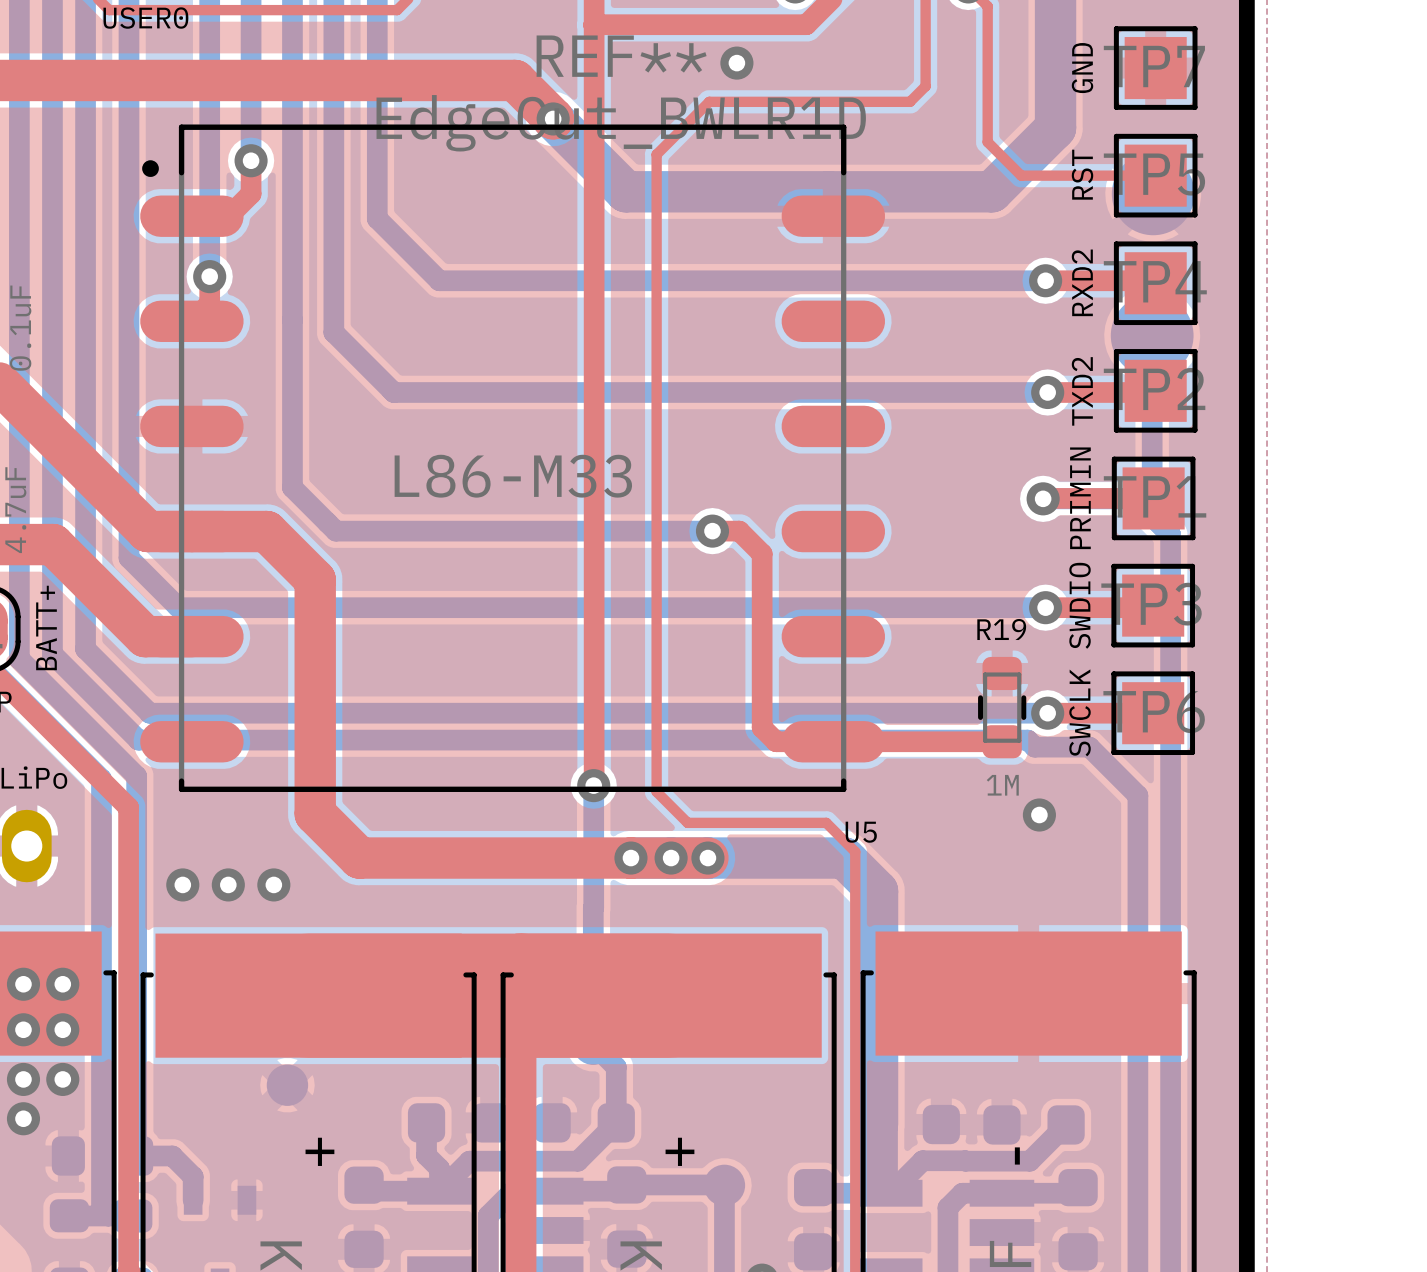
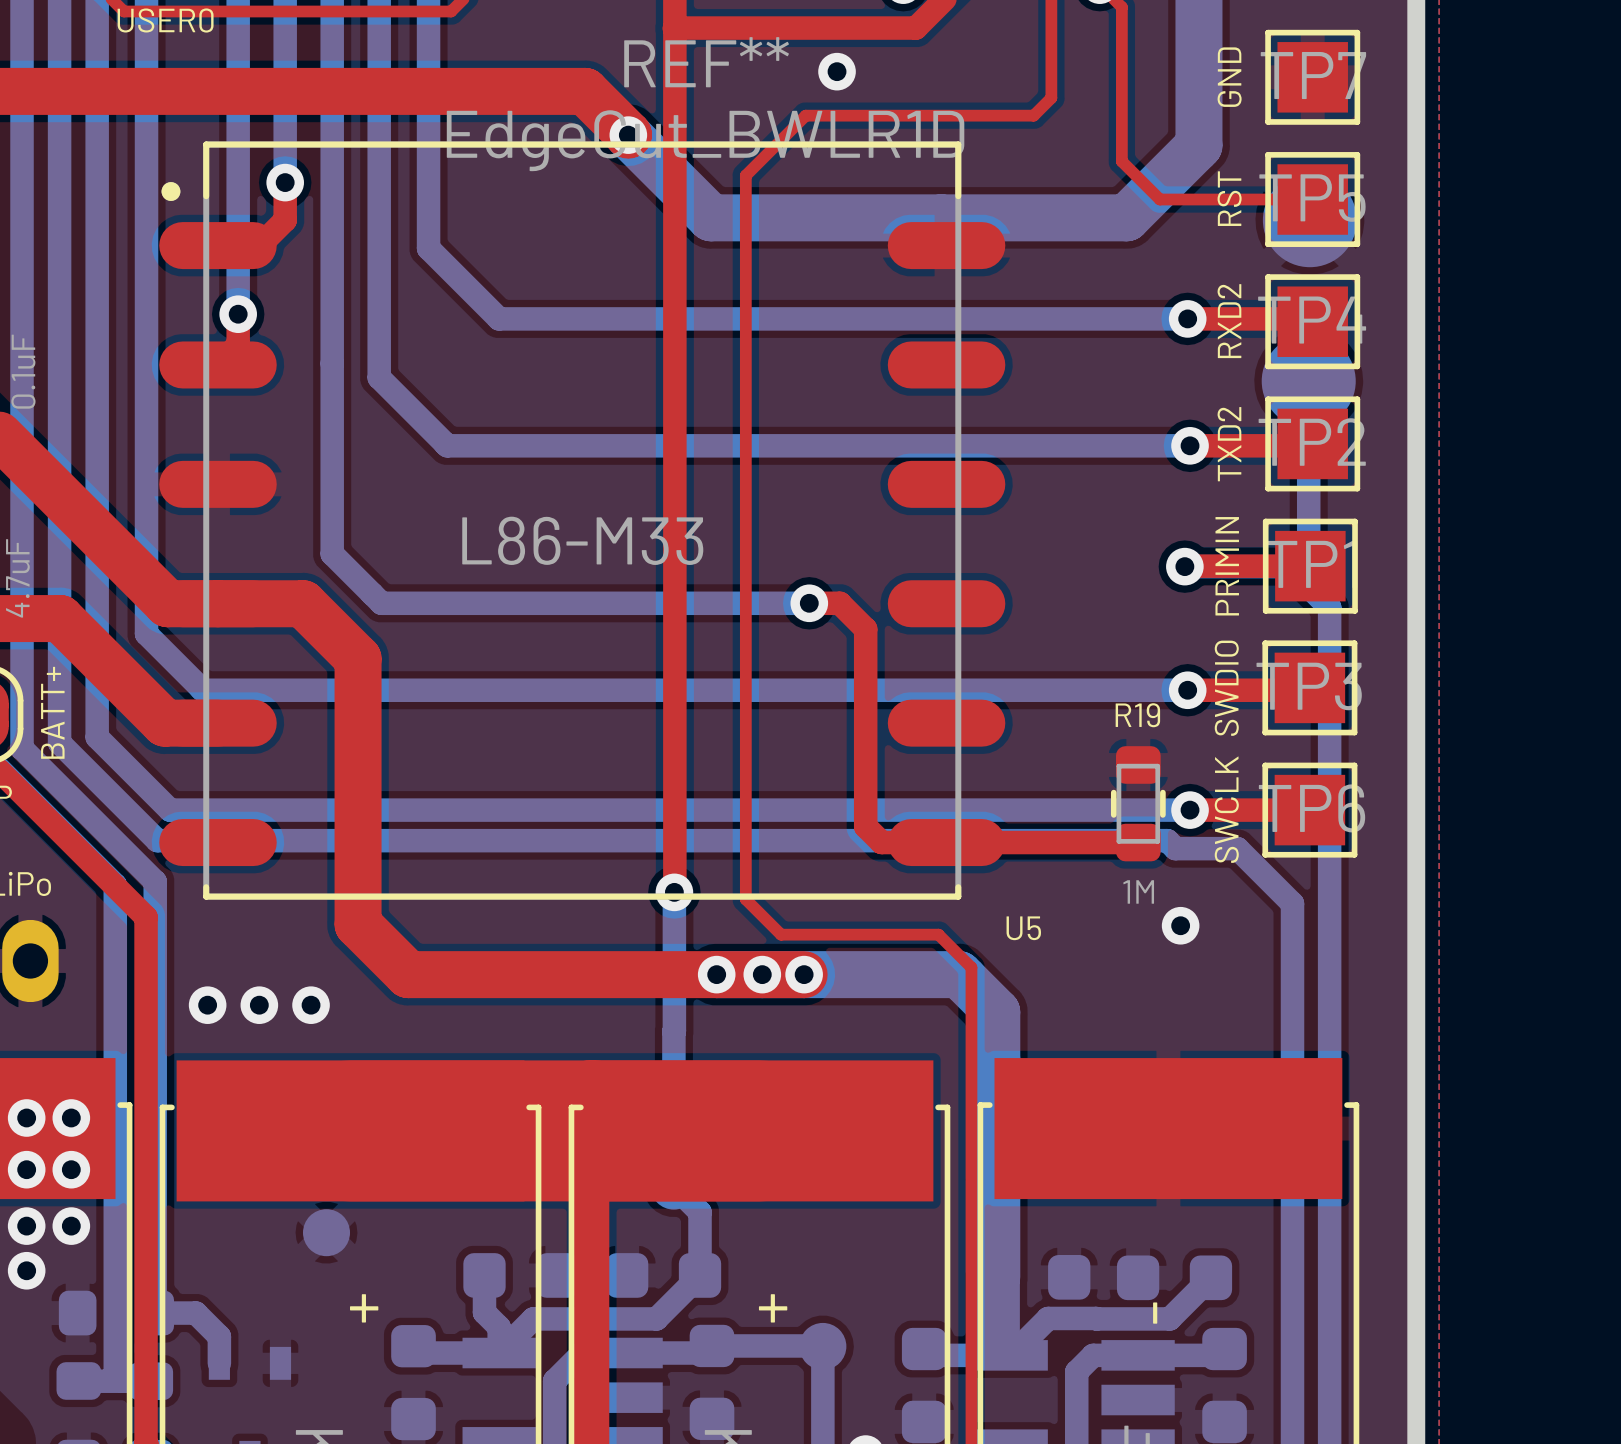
U5 name position: U5 (861, 832) -> U5 (1023, 928)

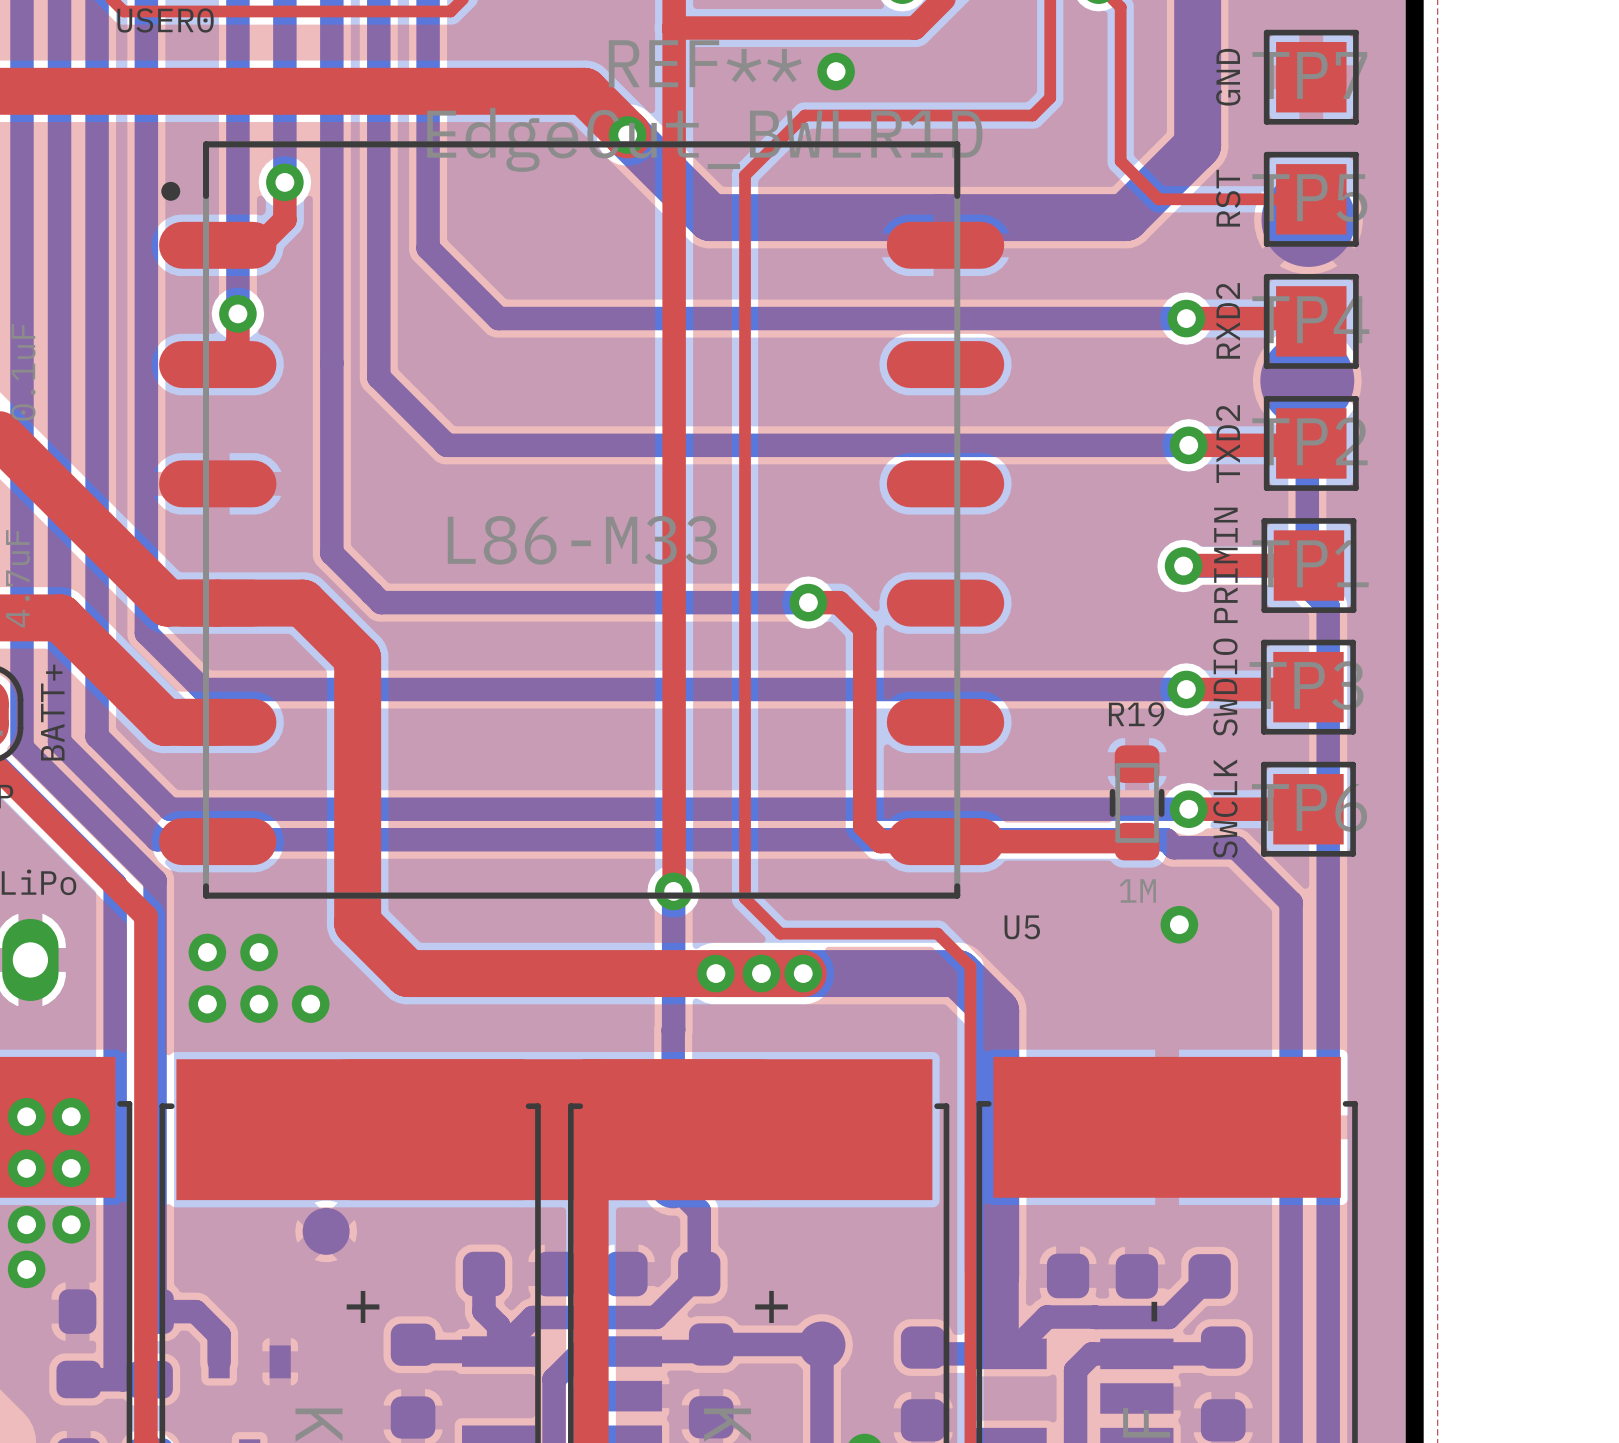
via: none -> (207, 952)
via: none -> (259, 952)

